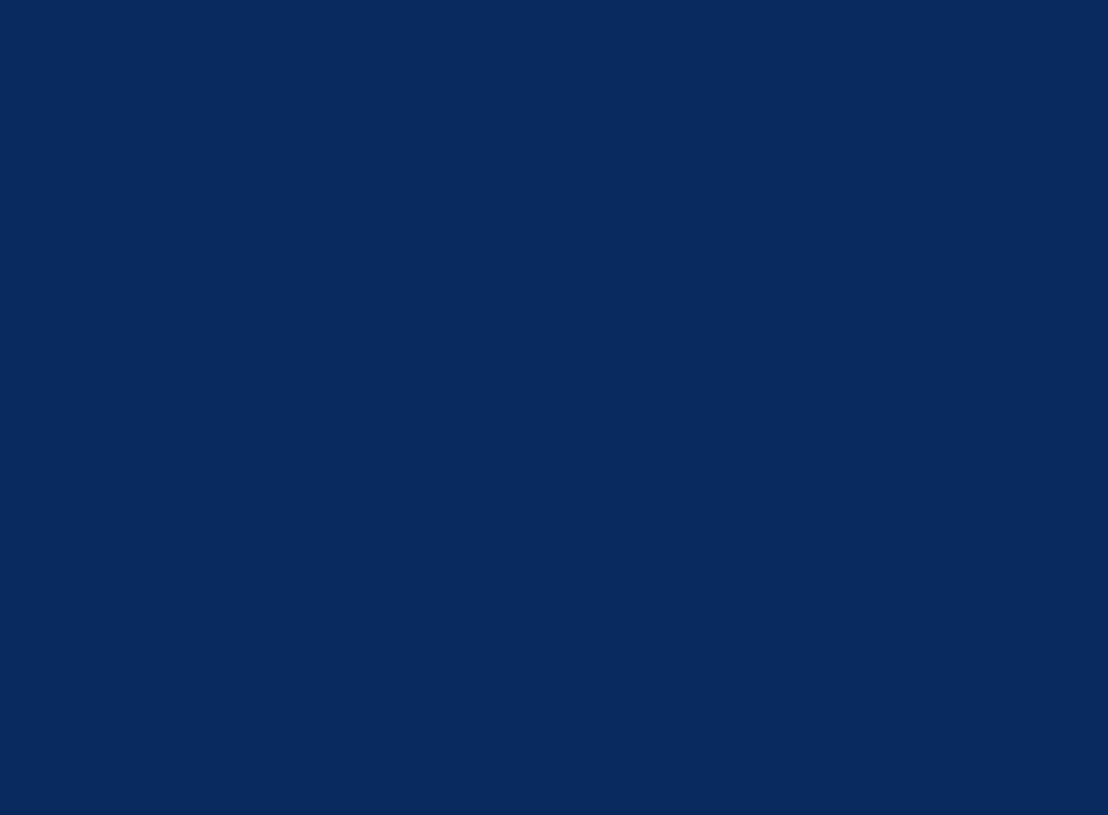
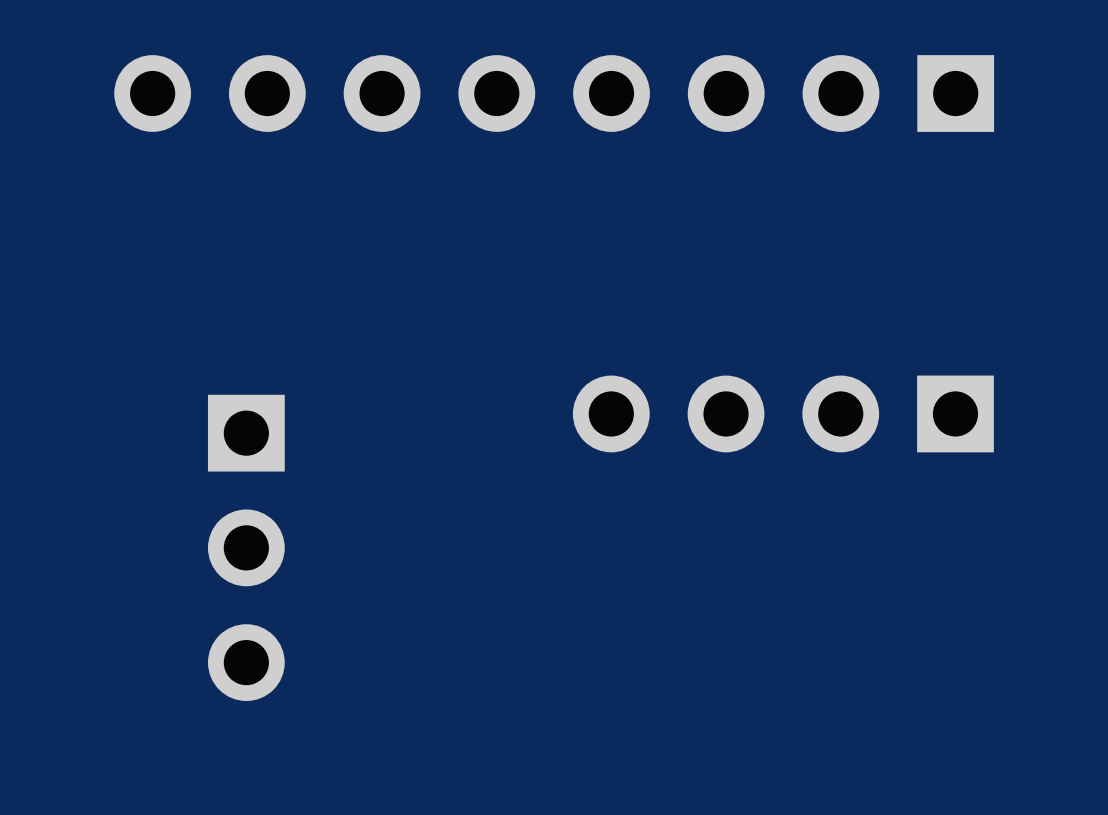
part: none -> (554, 93)
part: none -> (783, 413)
part: none -> (246, 547)

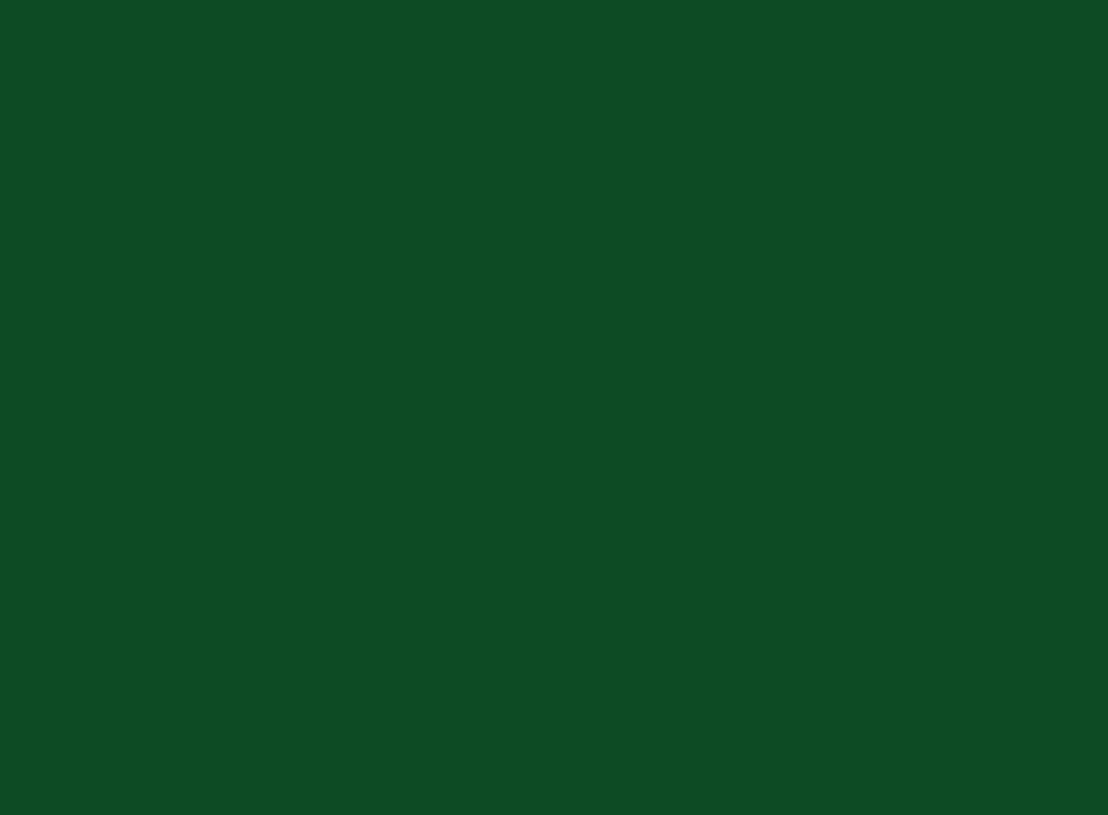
part: (554, 93) -> none
part: (783, 413) -> none
part: (246, 547) -> none

